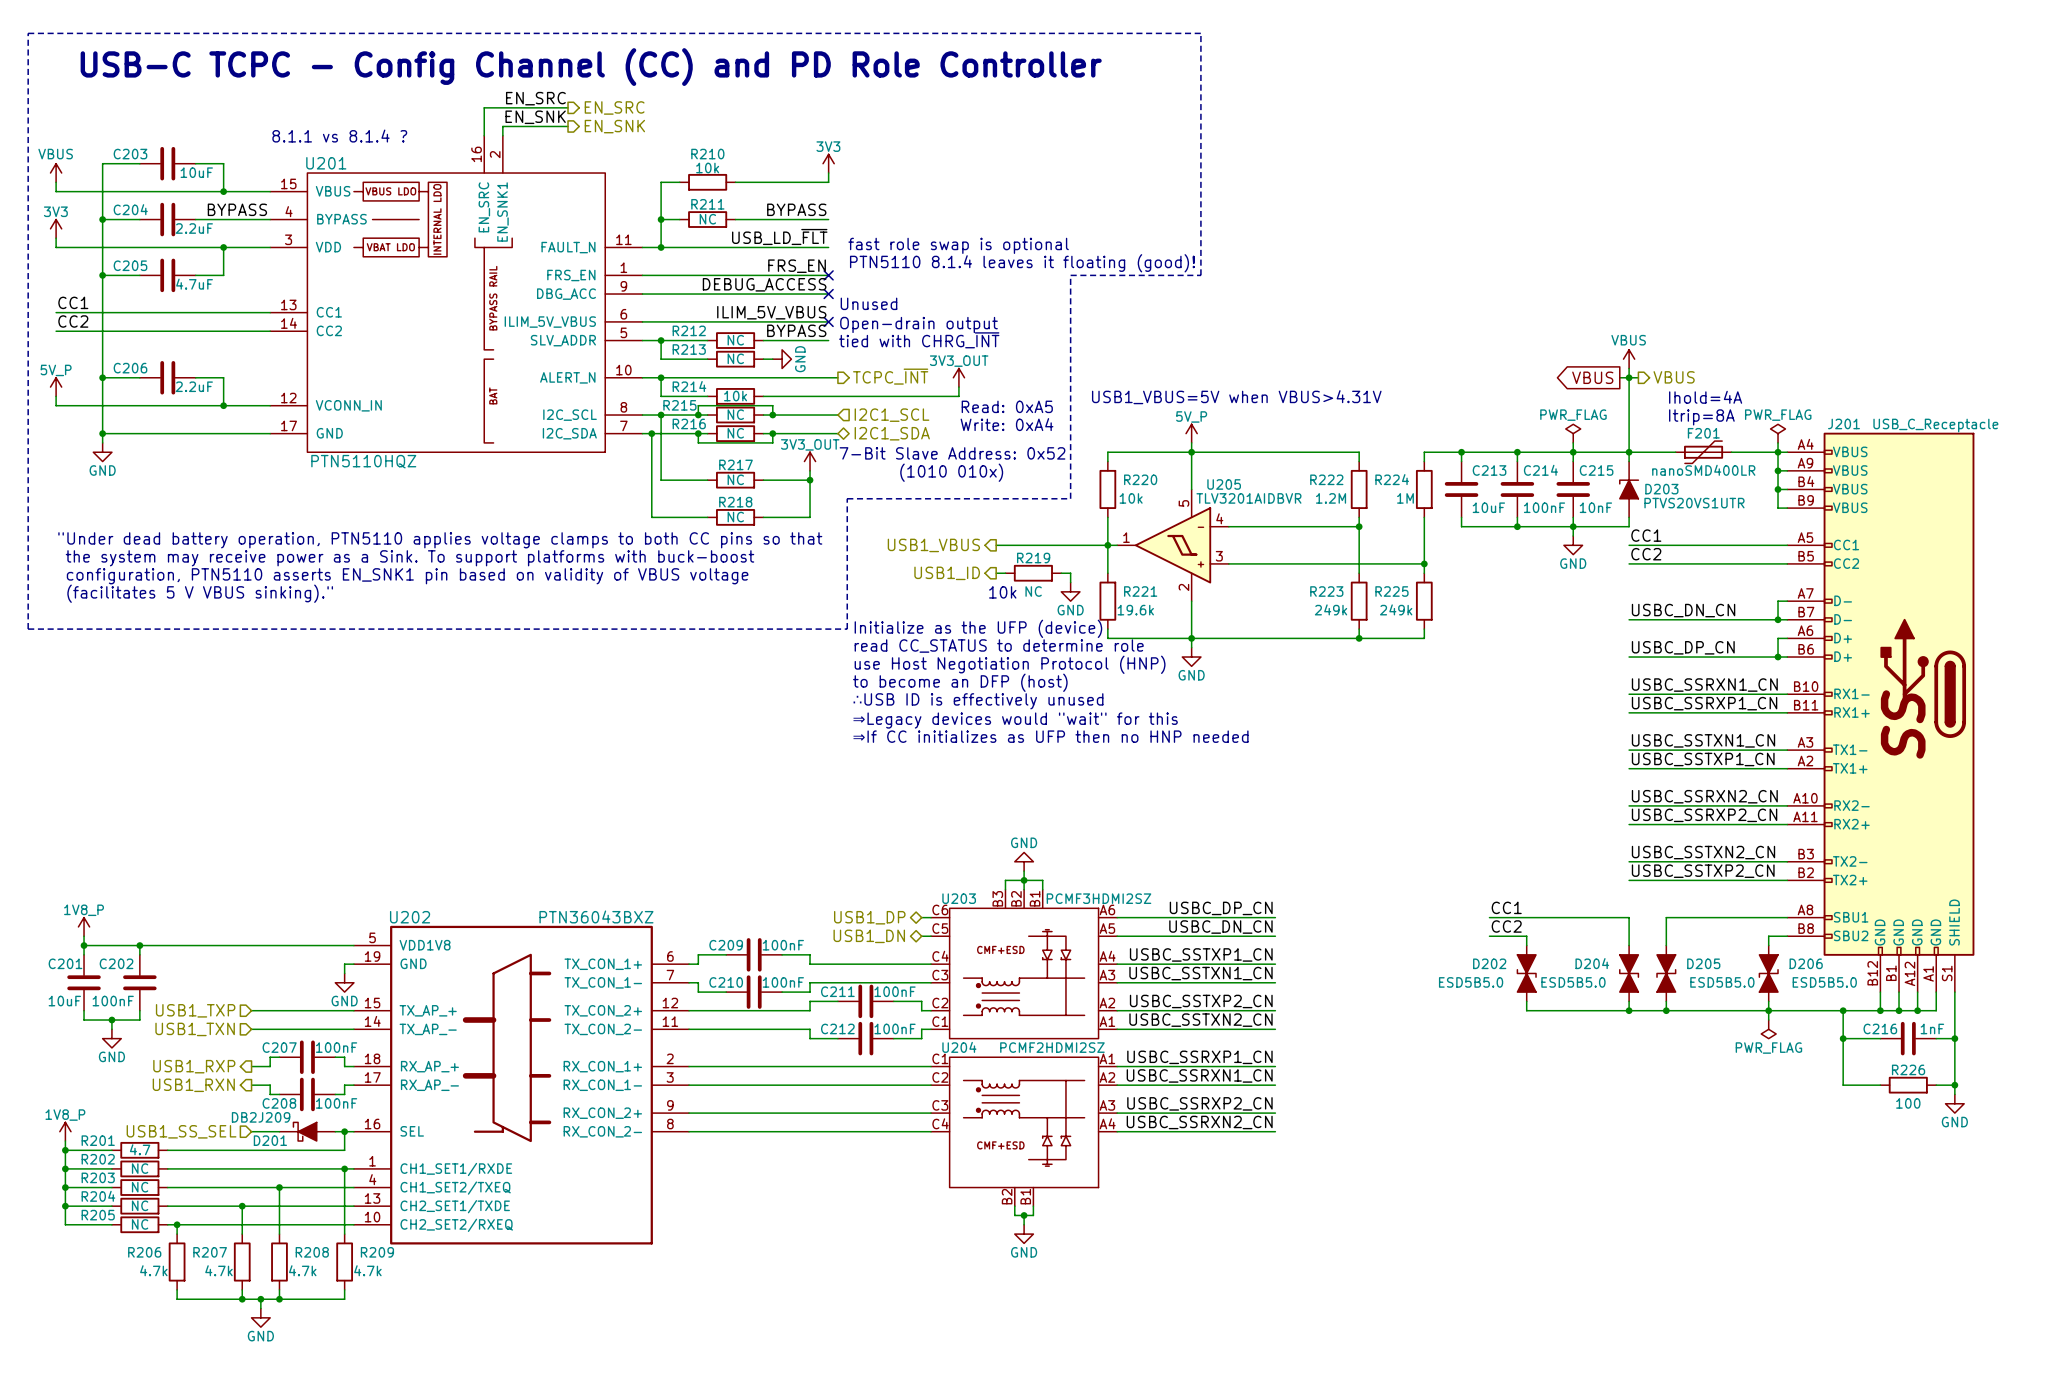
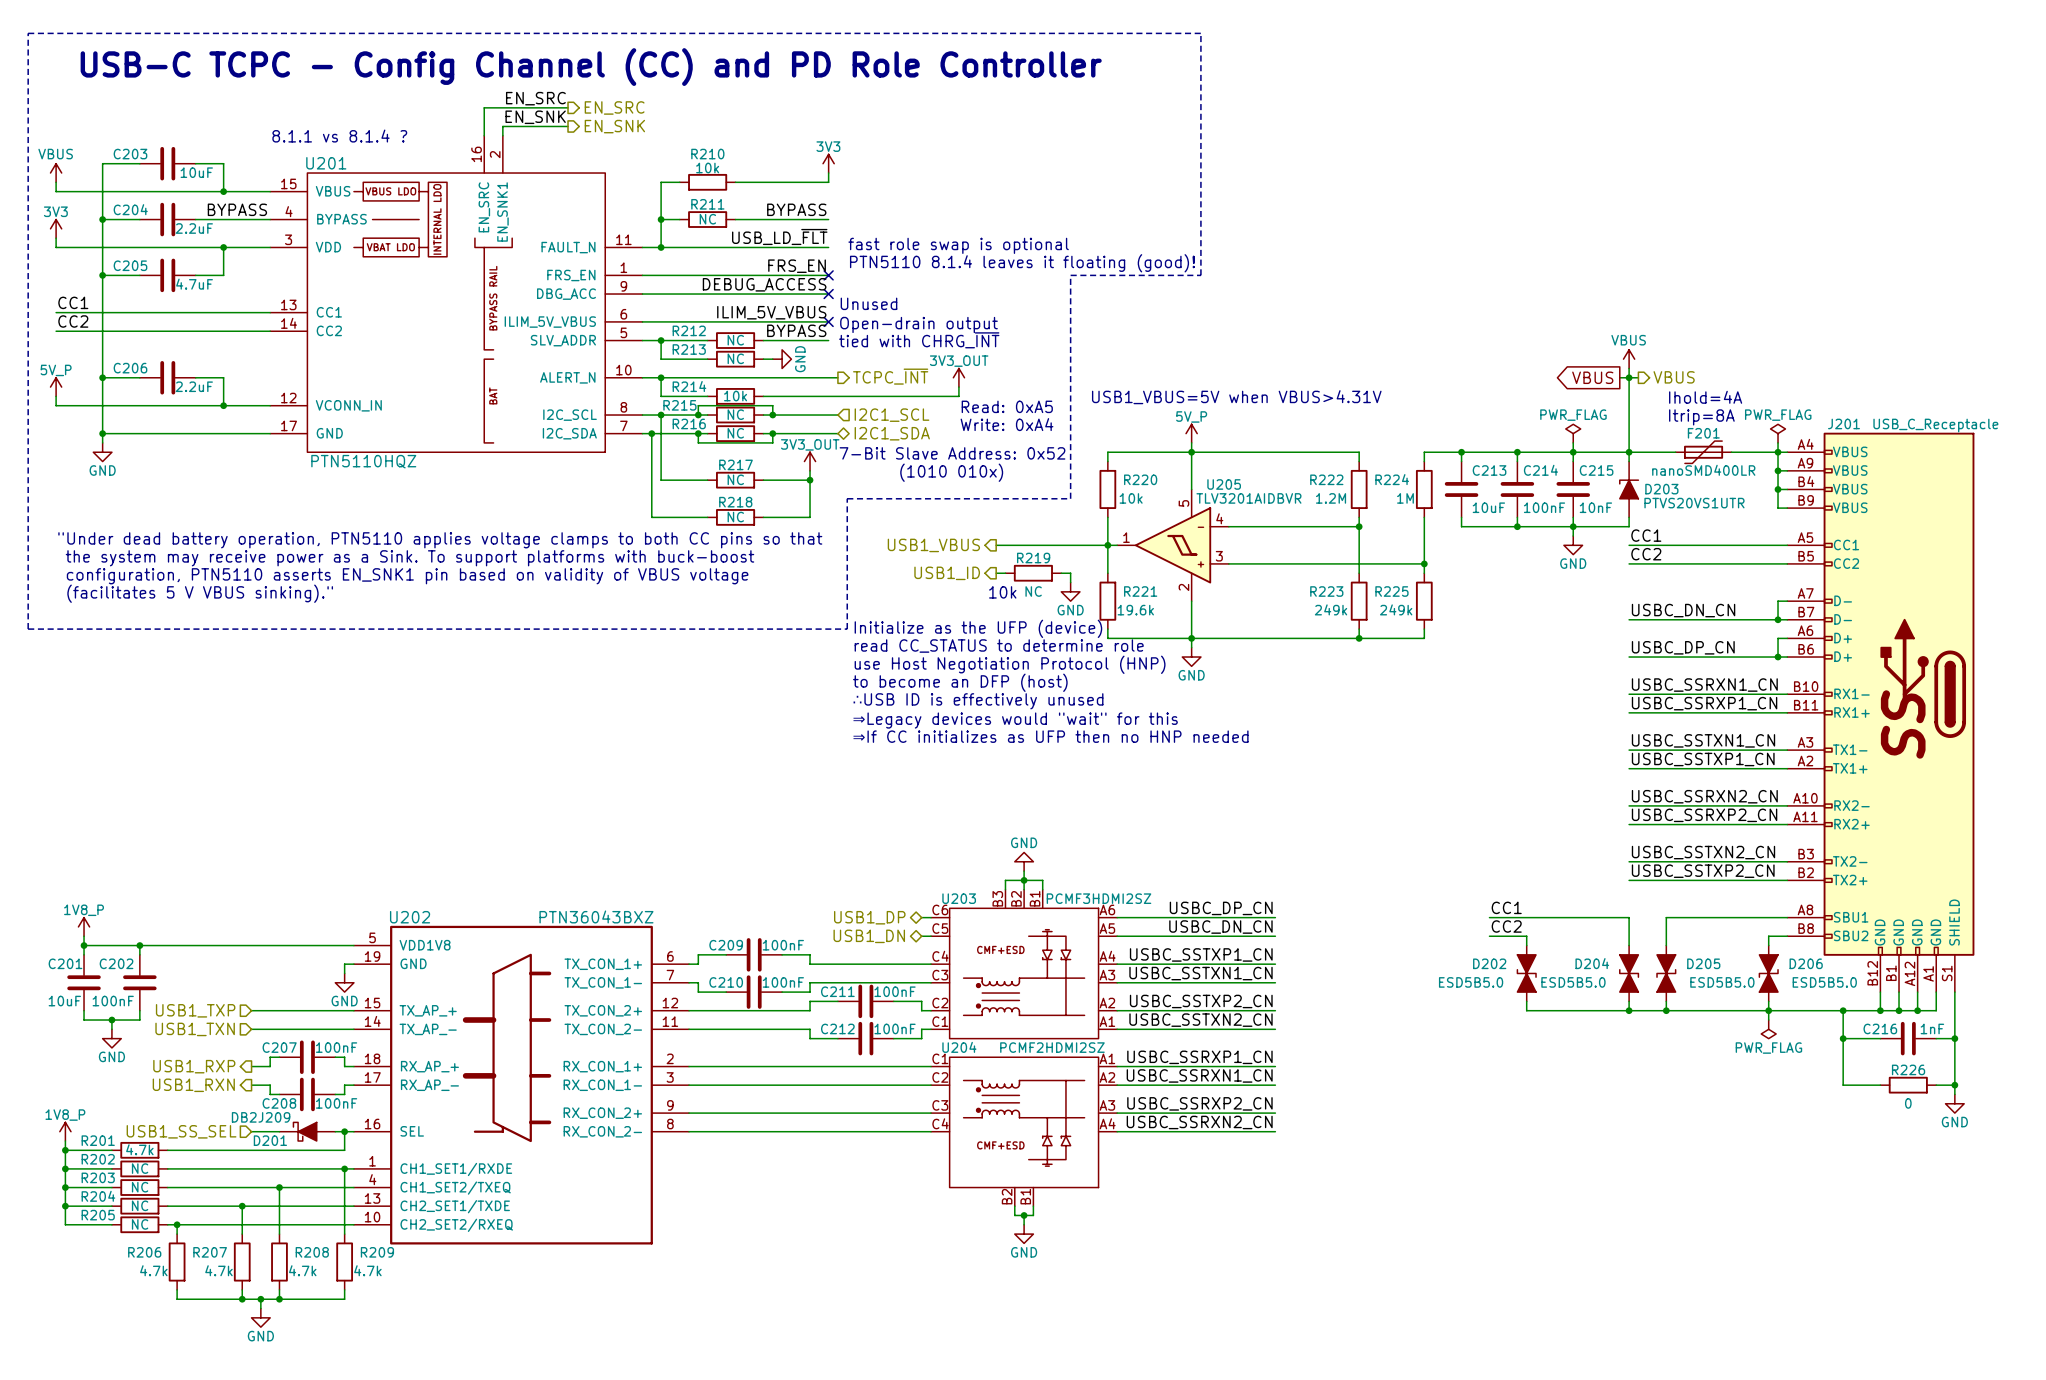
R226 value: 100 (1908, 1103) -> 0 (1908, 1103)
R201 value: 4.7 (140, 1149) -> 4.7k (139, 1149)

